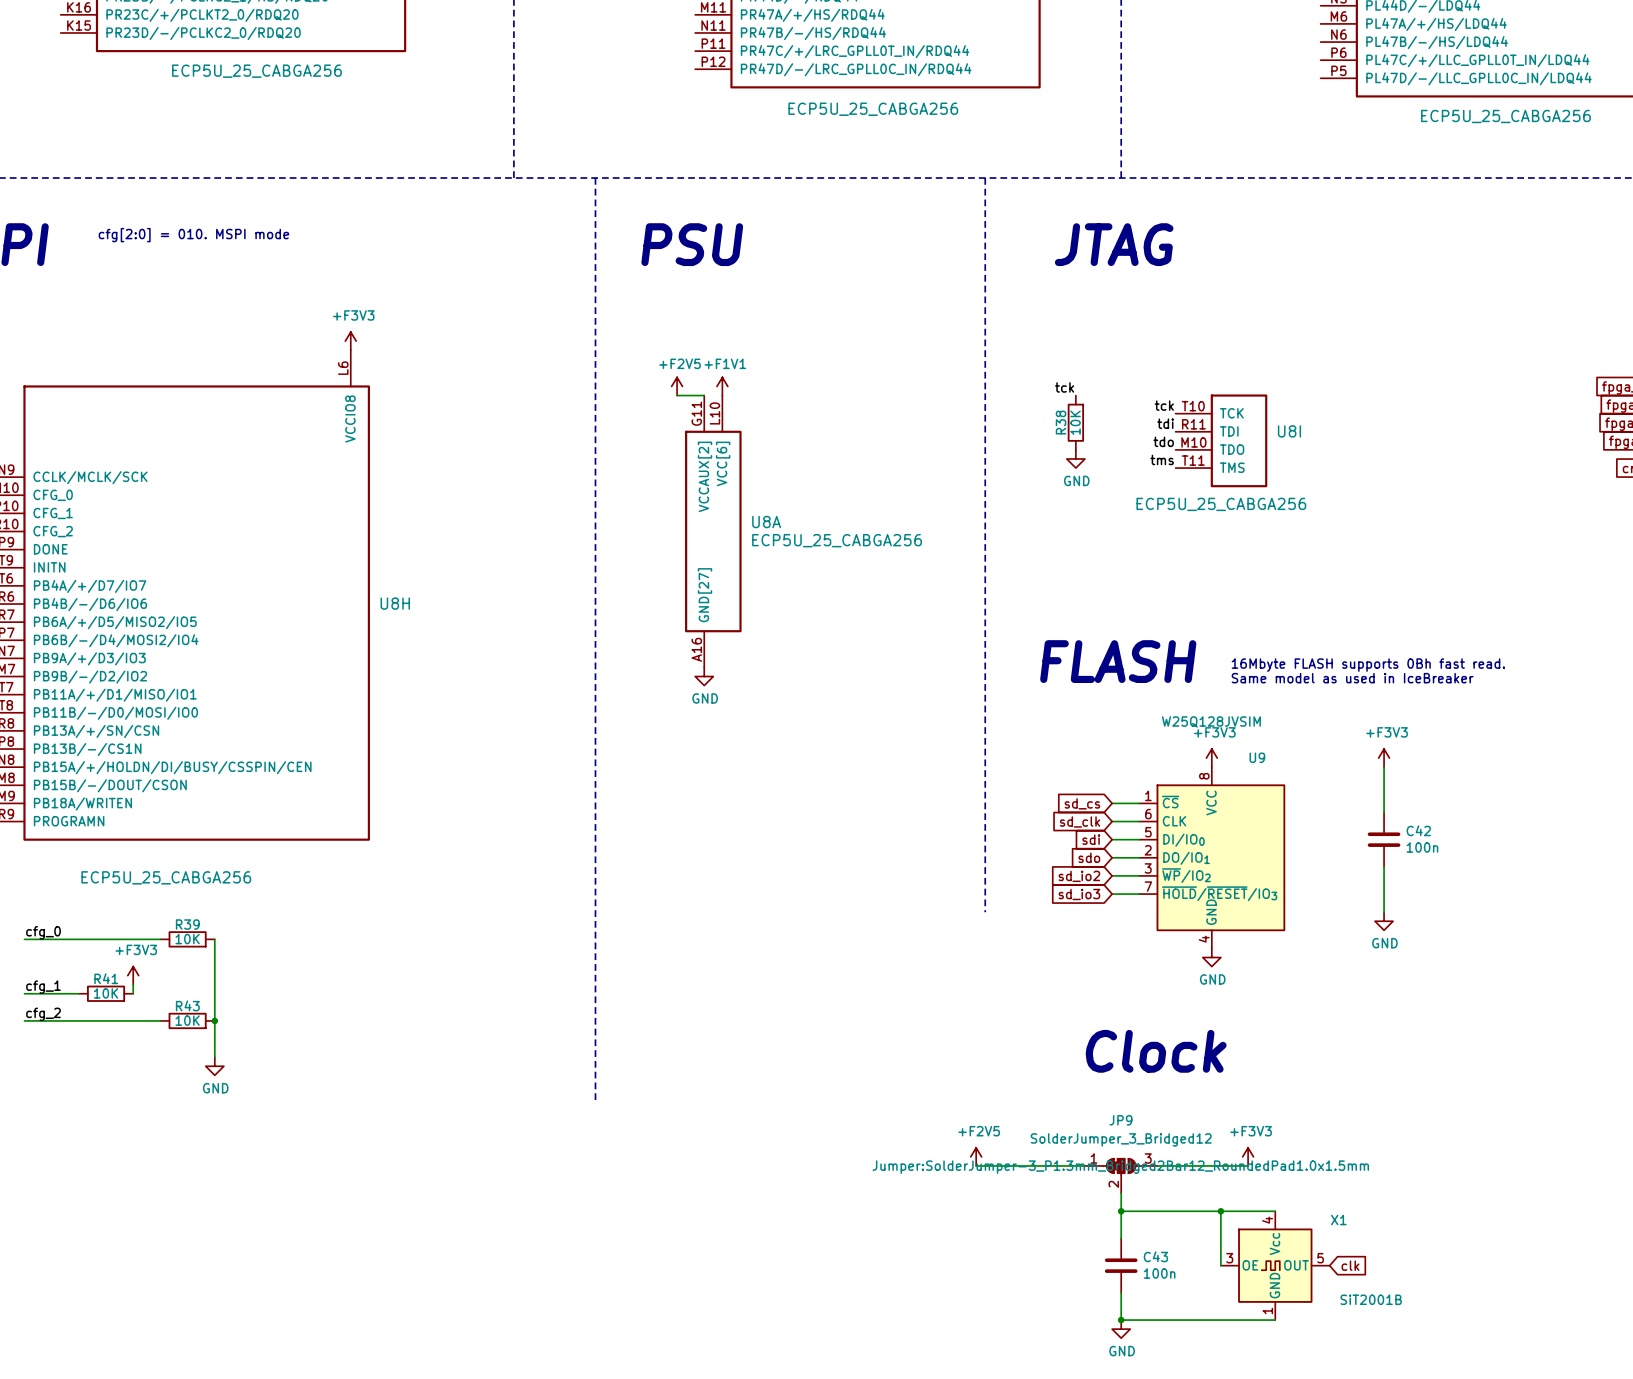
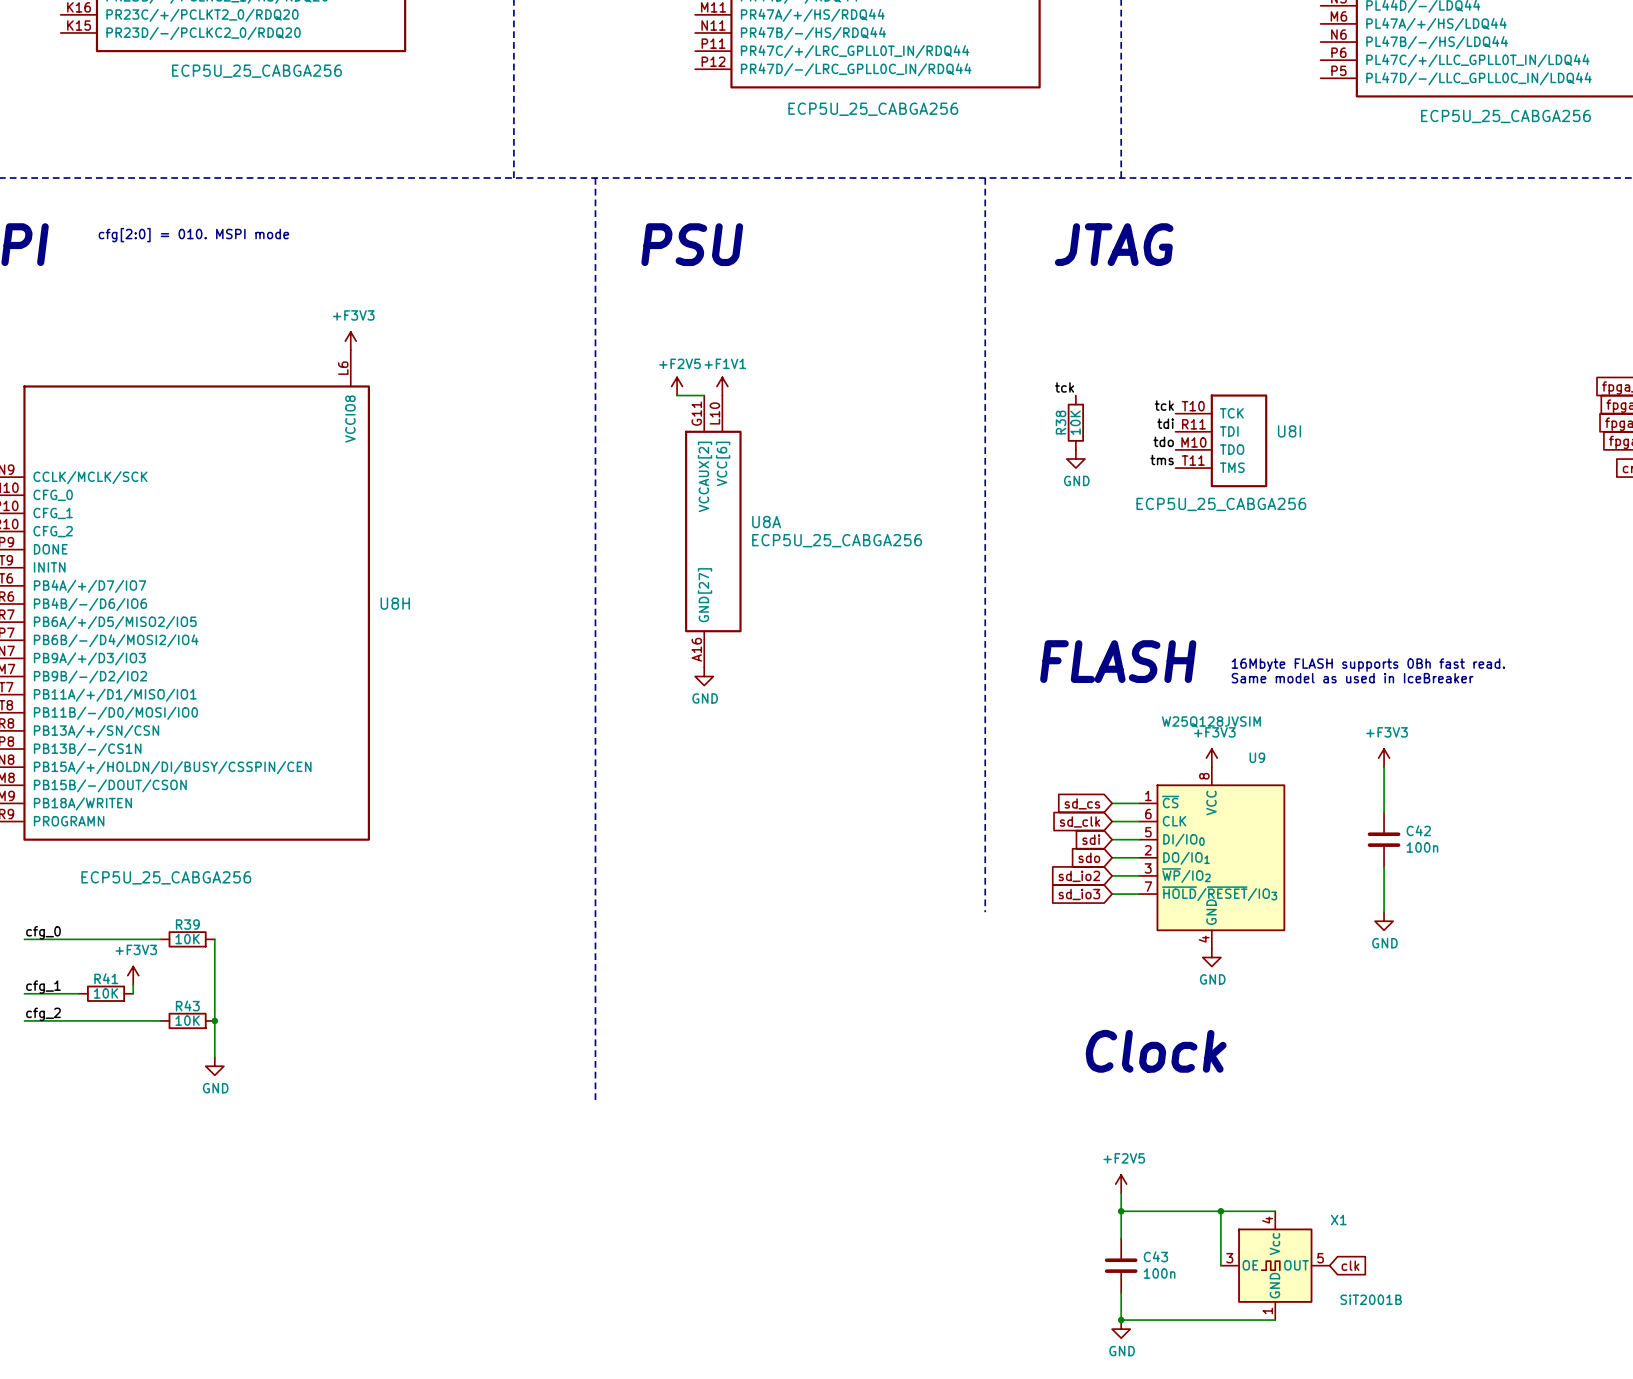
power symbol position: +F2V5 (976, 1156) -> +F2V5 (1121, 1184)
power symbol: +F3V3 (1248, 1156) -> none
wire: (976, 1165) (1084, 1165) -> none
wire: (1157, 1165) (1248, 1165) -> none
JP9: SolderJumper_3_Bridged12 (1121, 1175) -> none

